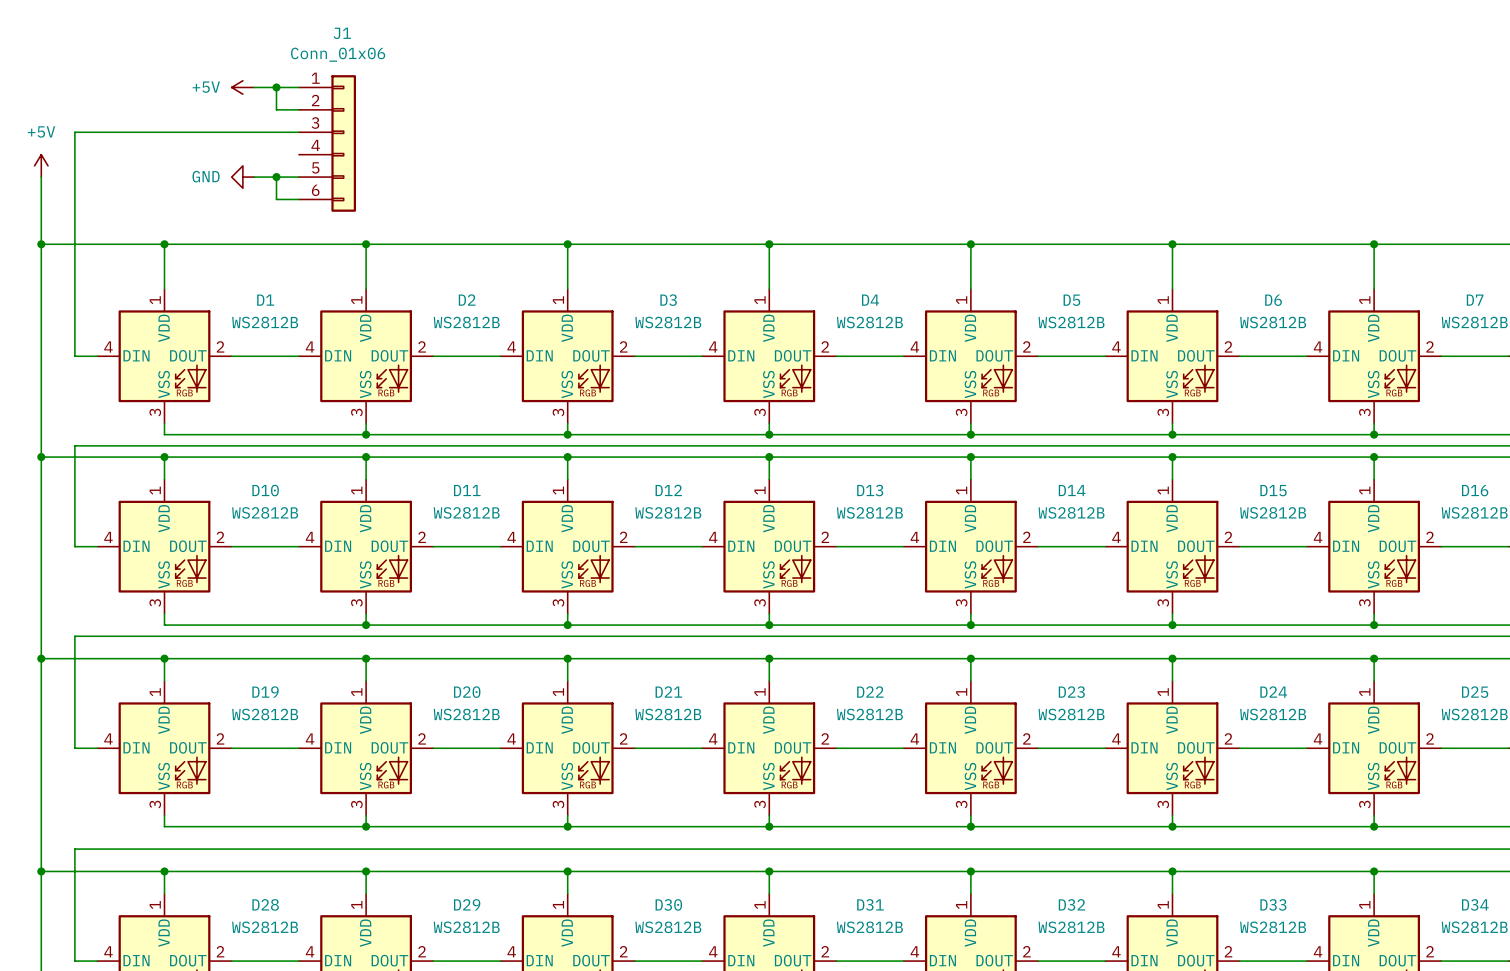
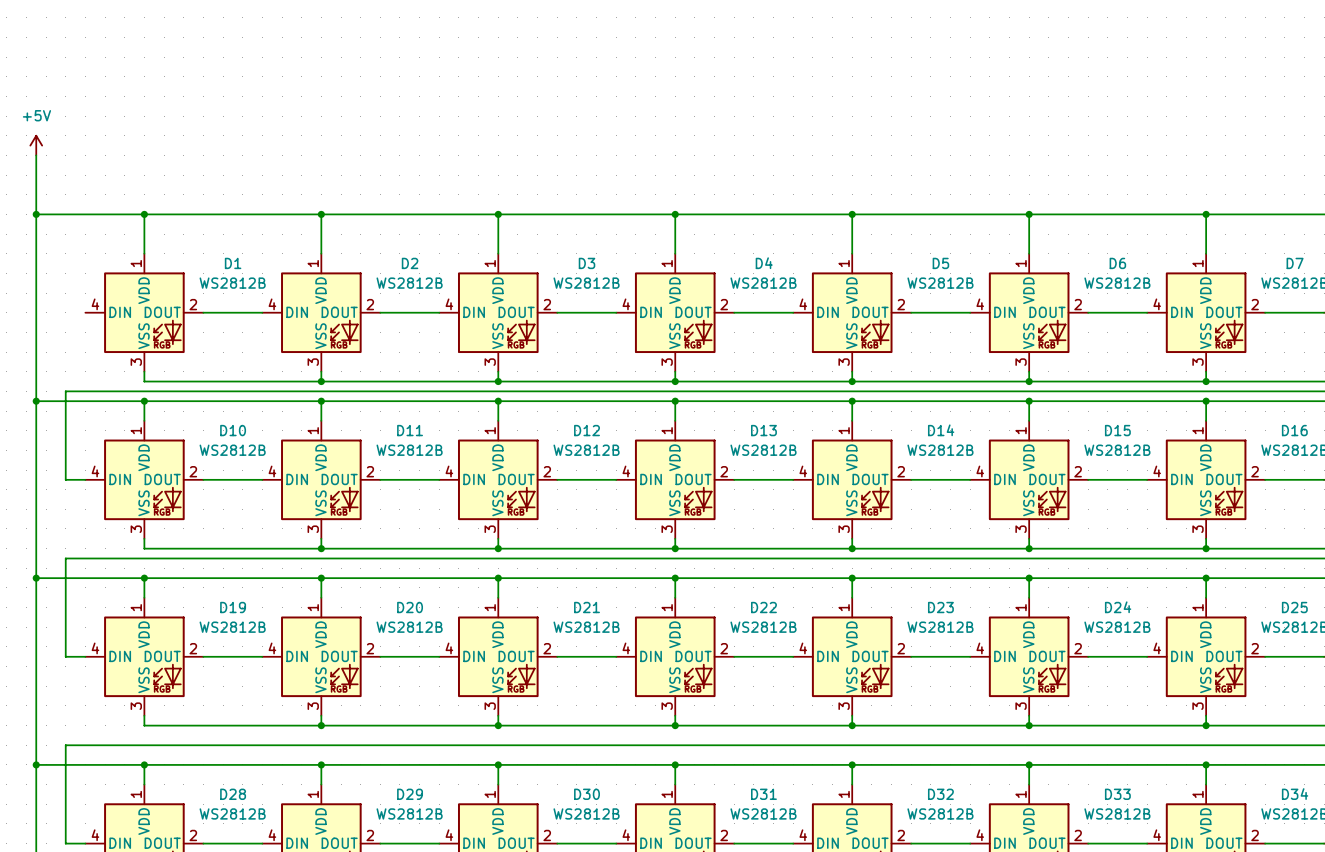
power symbol: +5V (242, 87) -> none
wire: (254, 87) (298, 87) -> none
wire: (276, 87) (276, 109) (298, 109) -> none
junction: (276, 87) -> none
wire: (298, 132) (74, 132) (74, 356) (97, 356) -> none
J1: Conn_01x06 (327, 143) -> none
power symbol: GND (242, 177) -> none
wire: (254, 177) (298, 177) -> none
wire: (276, 177) (276, 199) (298, 199) -> none
junction: (276, 177) -> none

